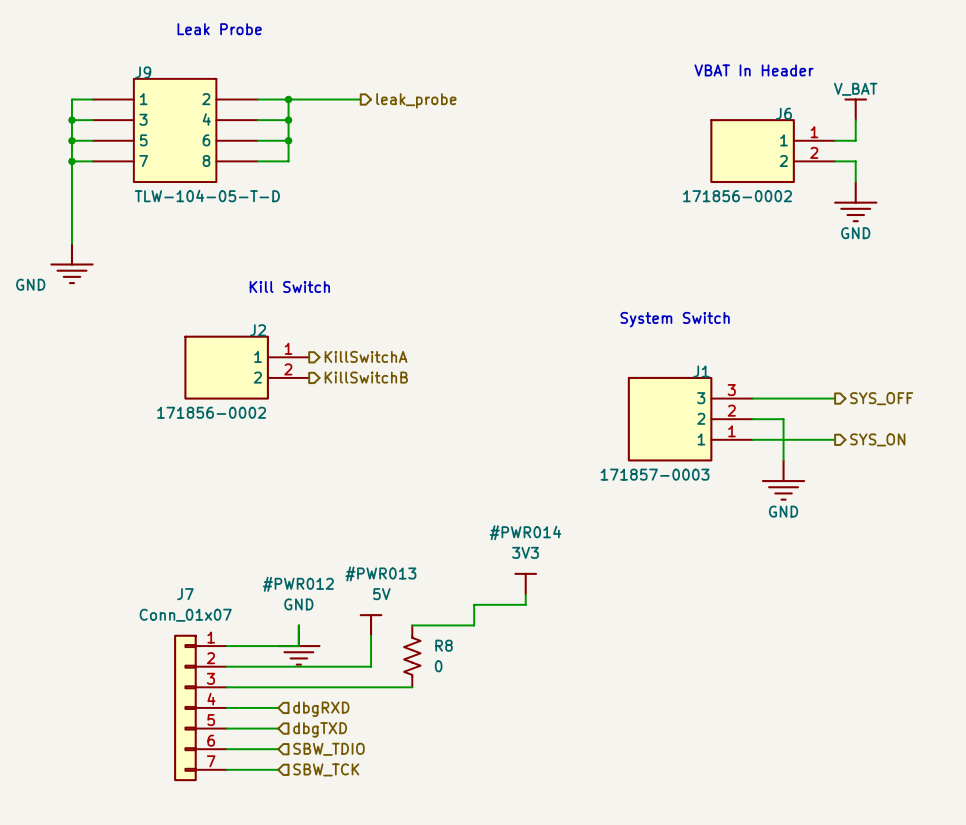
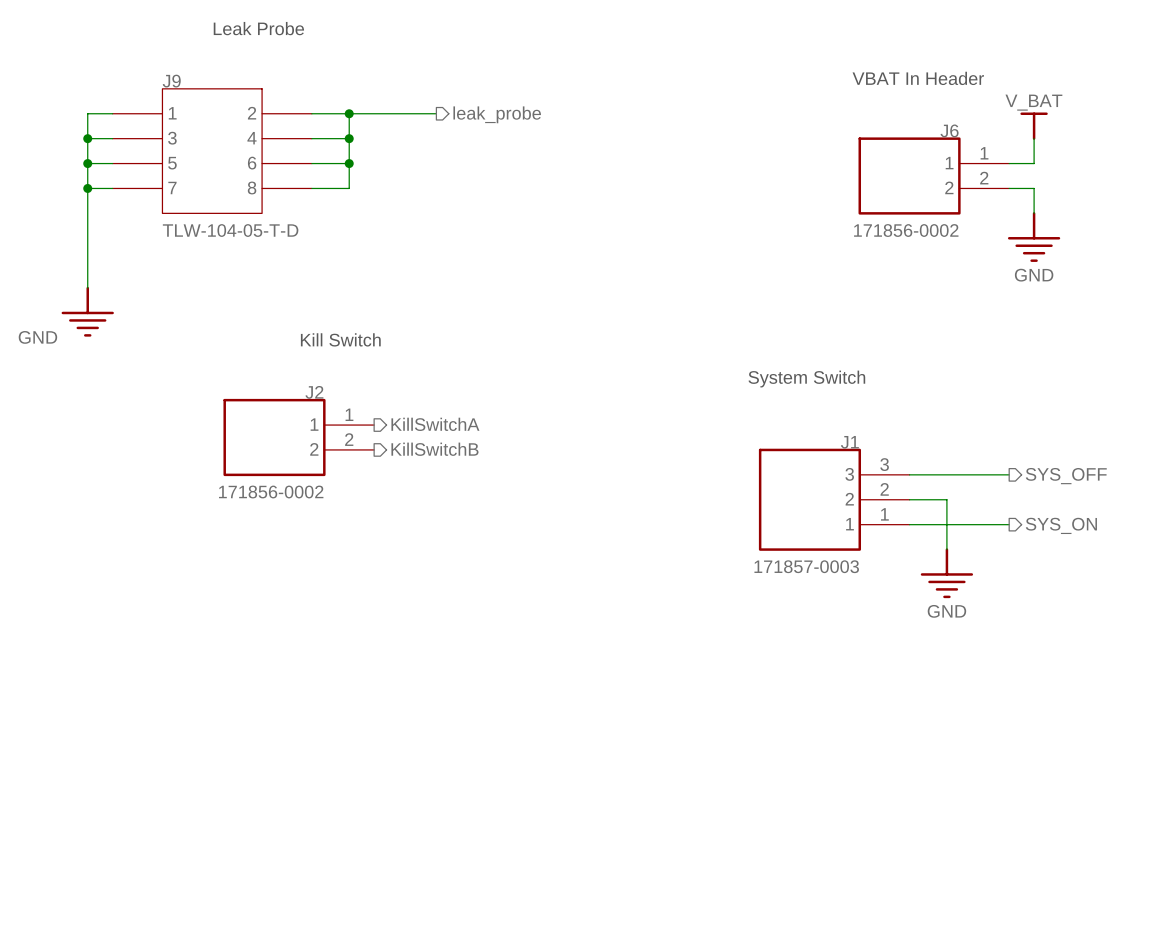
#PWR014: 3V3 (525, 584) -> none
wire: (525, 594) (525, 604) (474, 604) (474, 625) (412, 625) -> none
wire: (298, 625) (298, 646) (226, 646) -> none
#PWR013: 5V (371, 625) -> none
wire: (371, 635) (371, 666) (226, 666) -> none
#PWR012: GND (298, 645) -> none
R8: 0 (412, 656) -> none
wire: (226, 687) (412, 687) -> none
J7: Conn_01x07 (200, 707) -> none
wire: (226, 707) (278, 707) -> none
hierarchical label: dbgRXD (321, 709) -> none
wire: (226, 728) (278, 728) -> none
hierarchical label: dbgTXD (320, 729) -> none
wire: (226, 749) (278, 749) -> none
hierarchical label: SBW_TDIO (328, 749) -> none
wire: (226, 769) (278, 769) -> none
hierarchical label: SBW_TCK (326, 769) -> none

